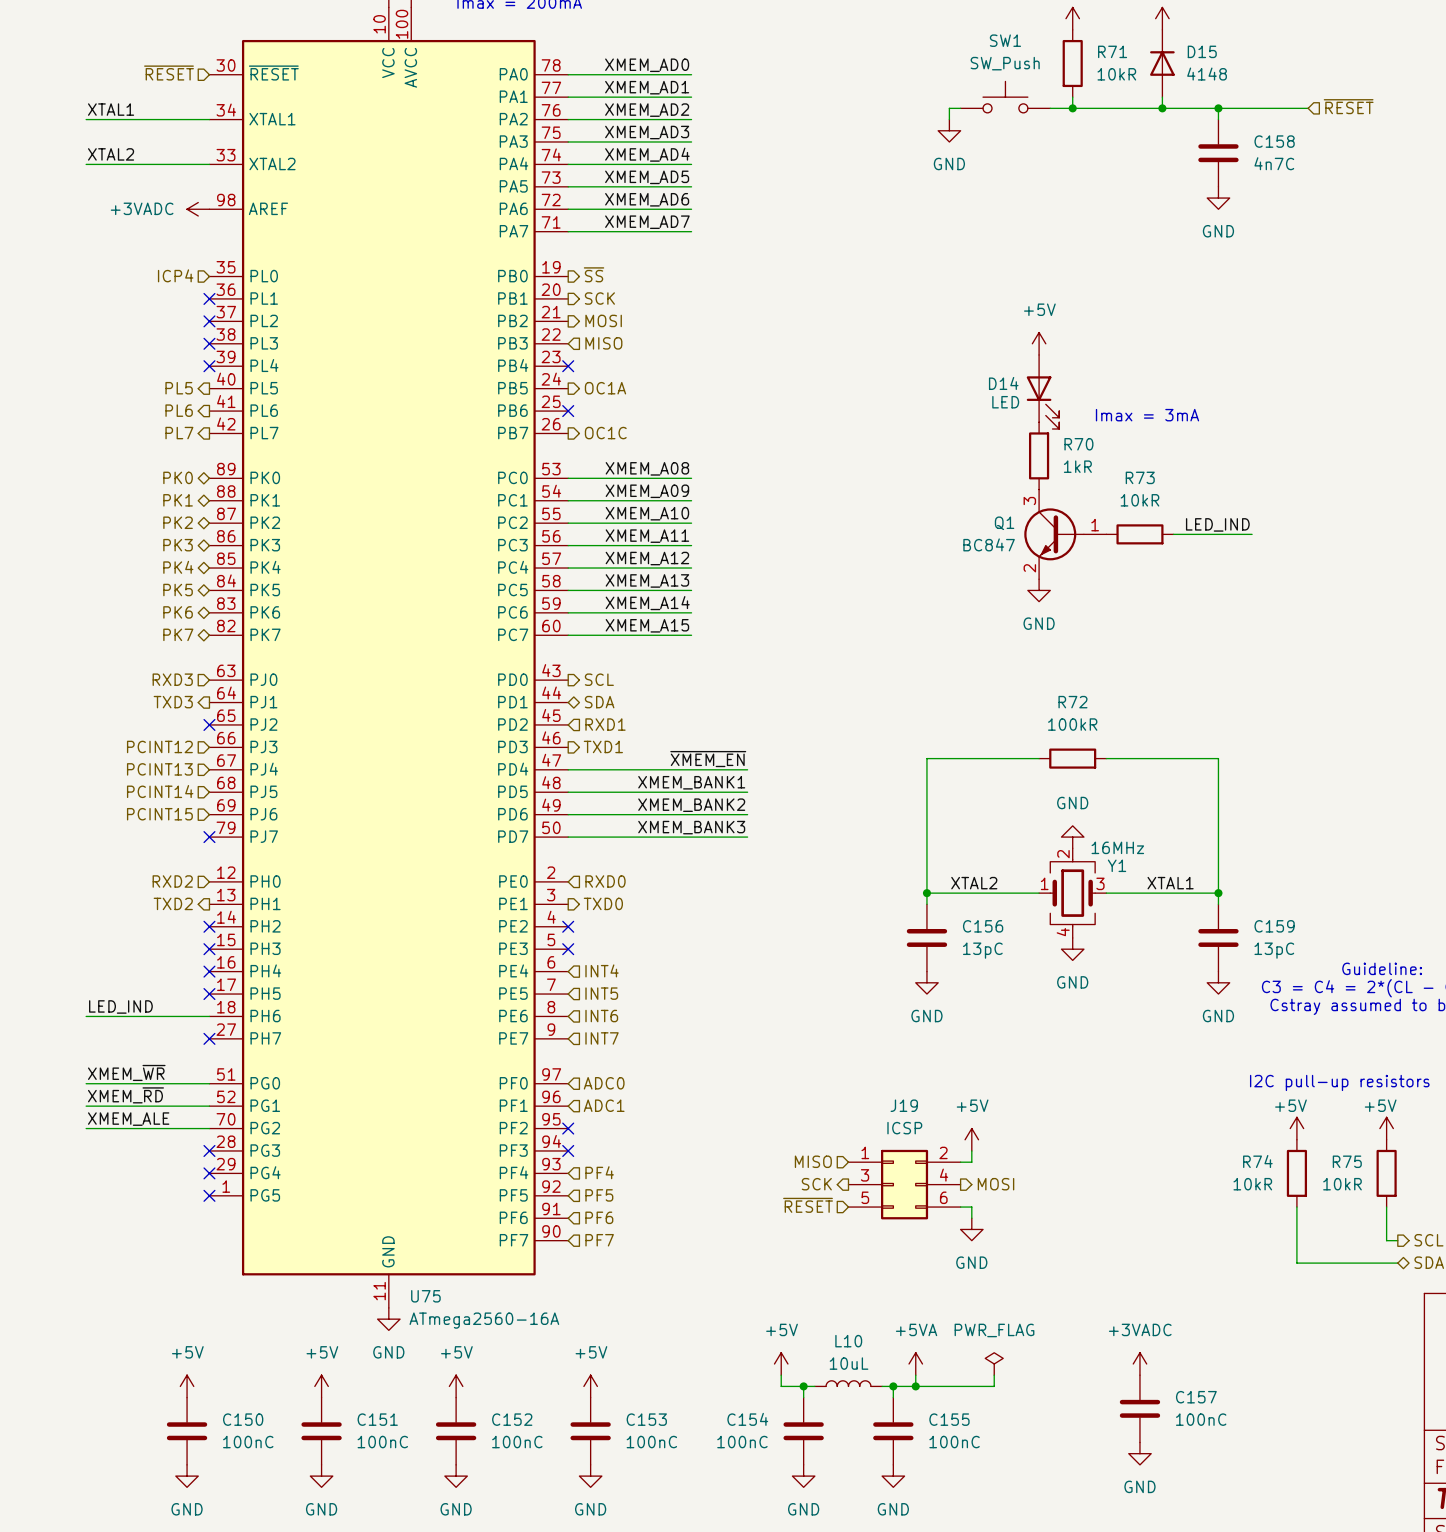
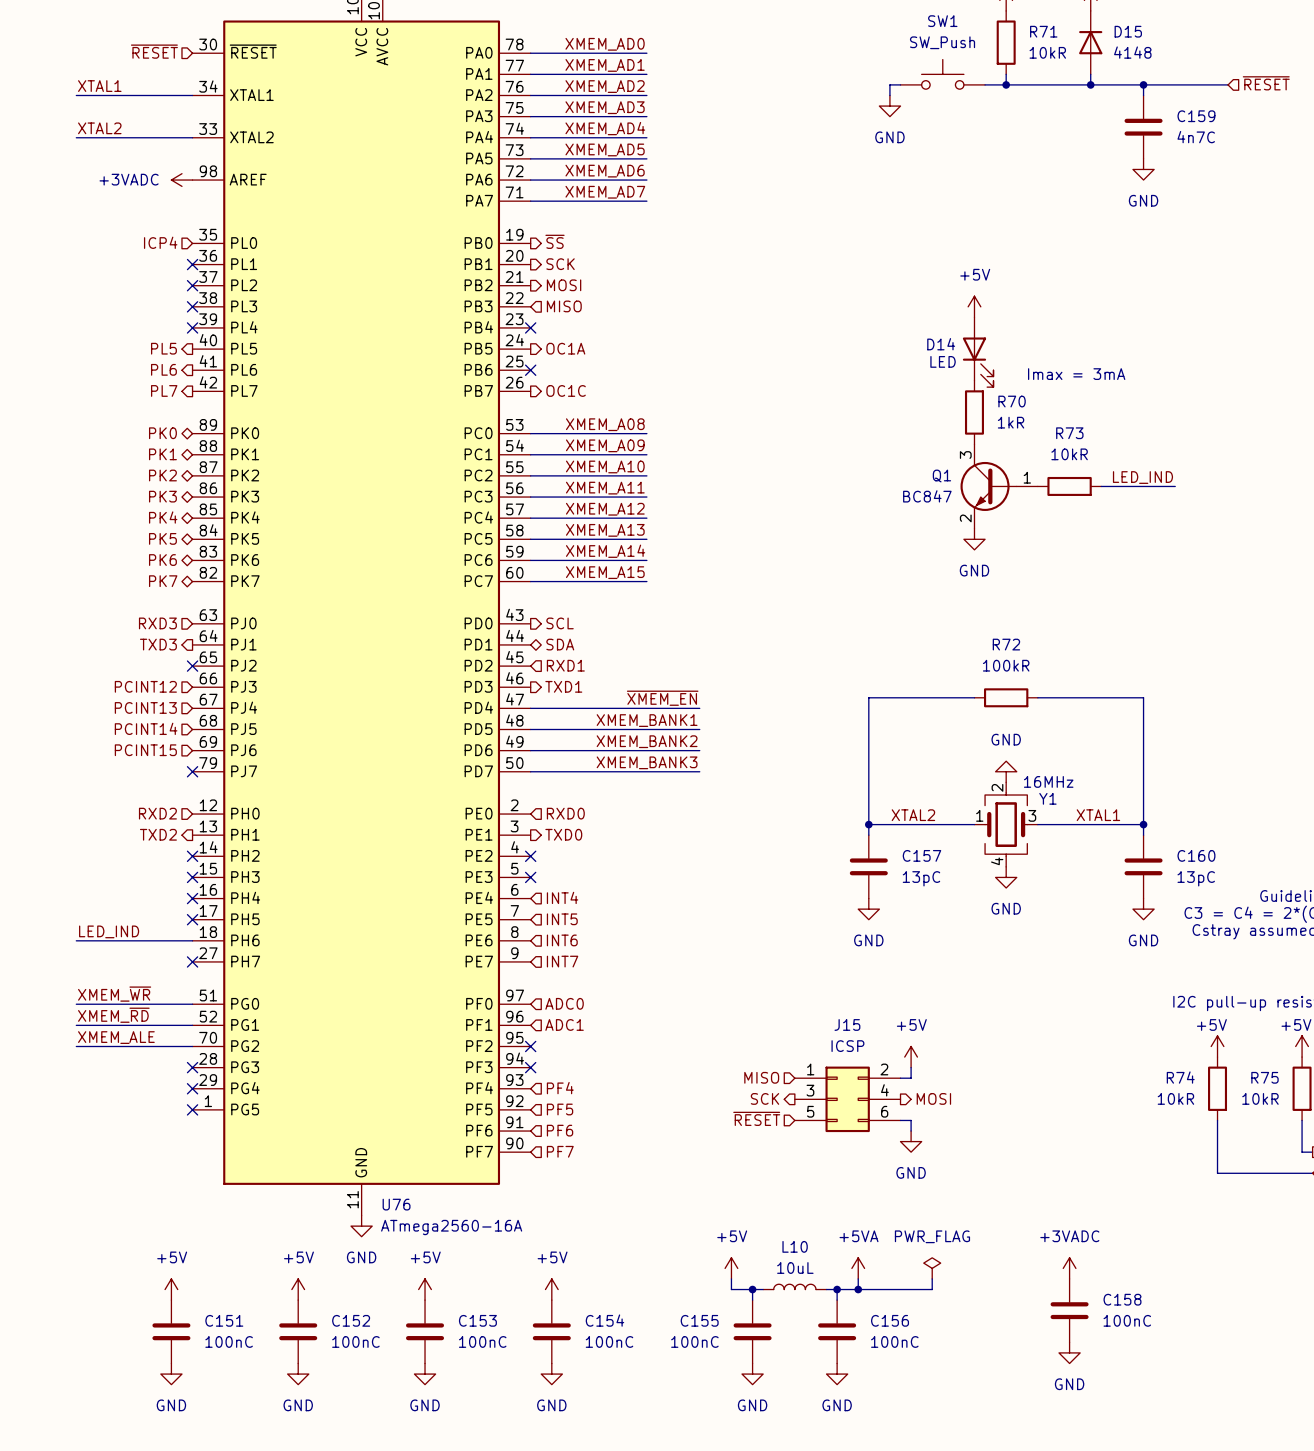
C158 name: C158 (1274, 141) -> C159 (1196, 116)
C156 name: C156 (983, 926) -> C157 (921, 855)
C159 name: C159 (1274, 926) -> C160 (1196, 855)
J19 name: J19 (904, 1105) -> J15 (847, 1024)
U75 name: U75 (425, 1296) -> U76 (396, 1204)
C157 name: C157 (1196, 1397) -> C158 (1122, 1299)
C150 name: C150 (243, 1419) -> C151 (224, 1320)
C151 name: C151 (377, 1419) -> C152 (351, 1320)
C152 name: C152 (512, 1419) -> C153 (477, 1320)
C153 name: C153 (646, 1419) -> C154 (604, 1320)
C154 name: C154 (747, 1419) -> C155 (699, 1320)
C155 name: C155 (949, 1419) -> C156 (890, 1320)

